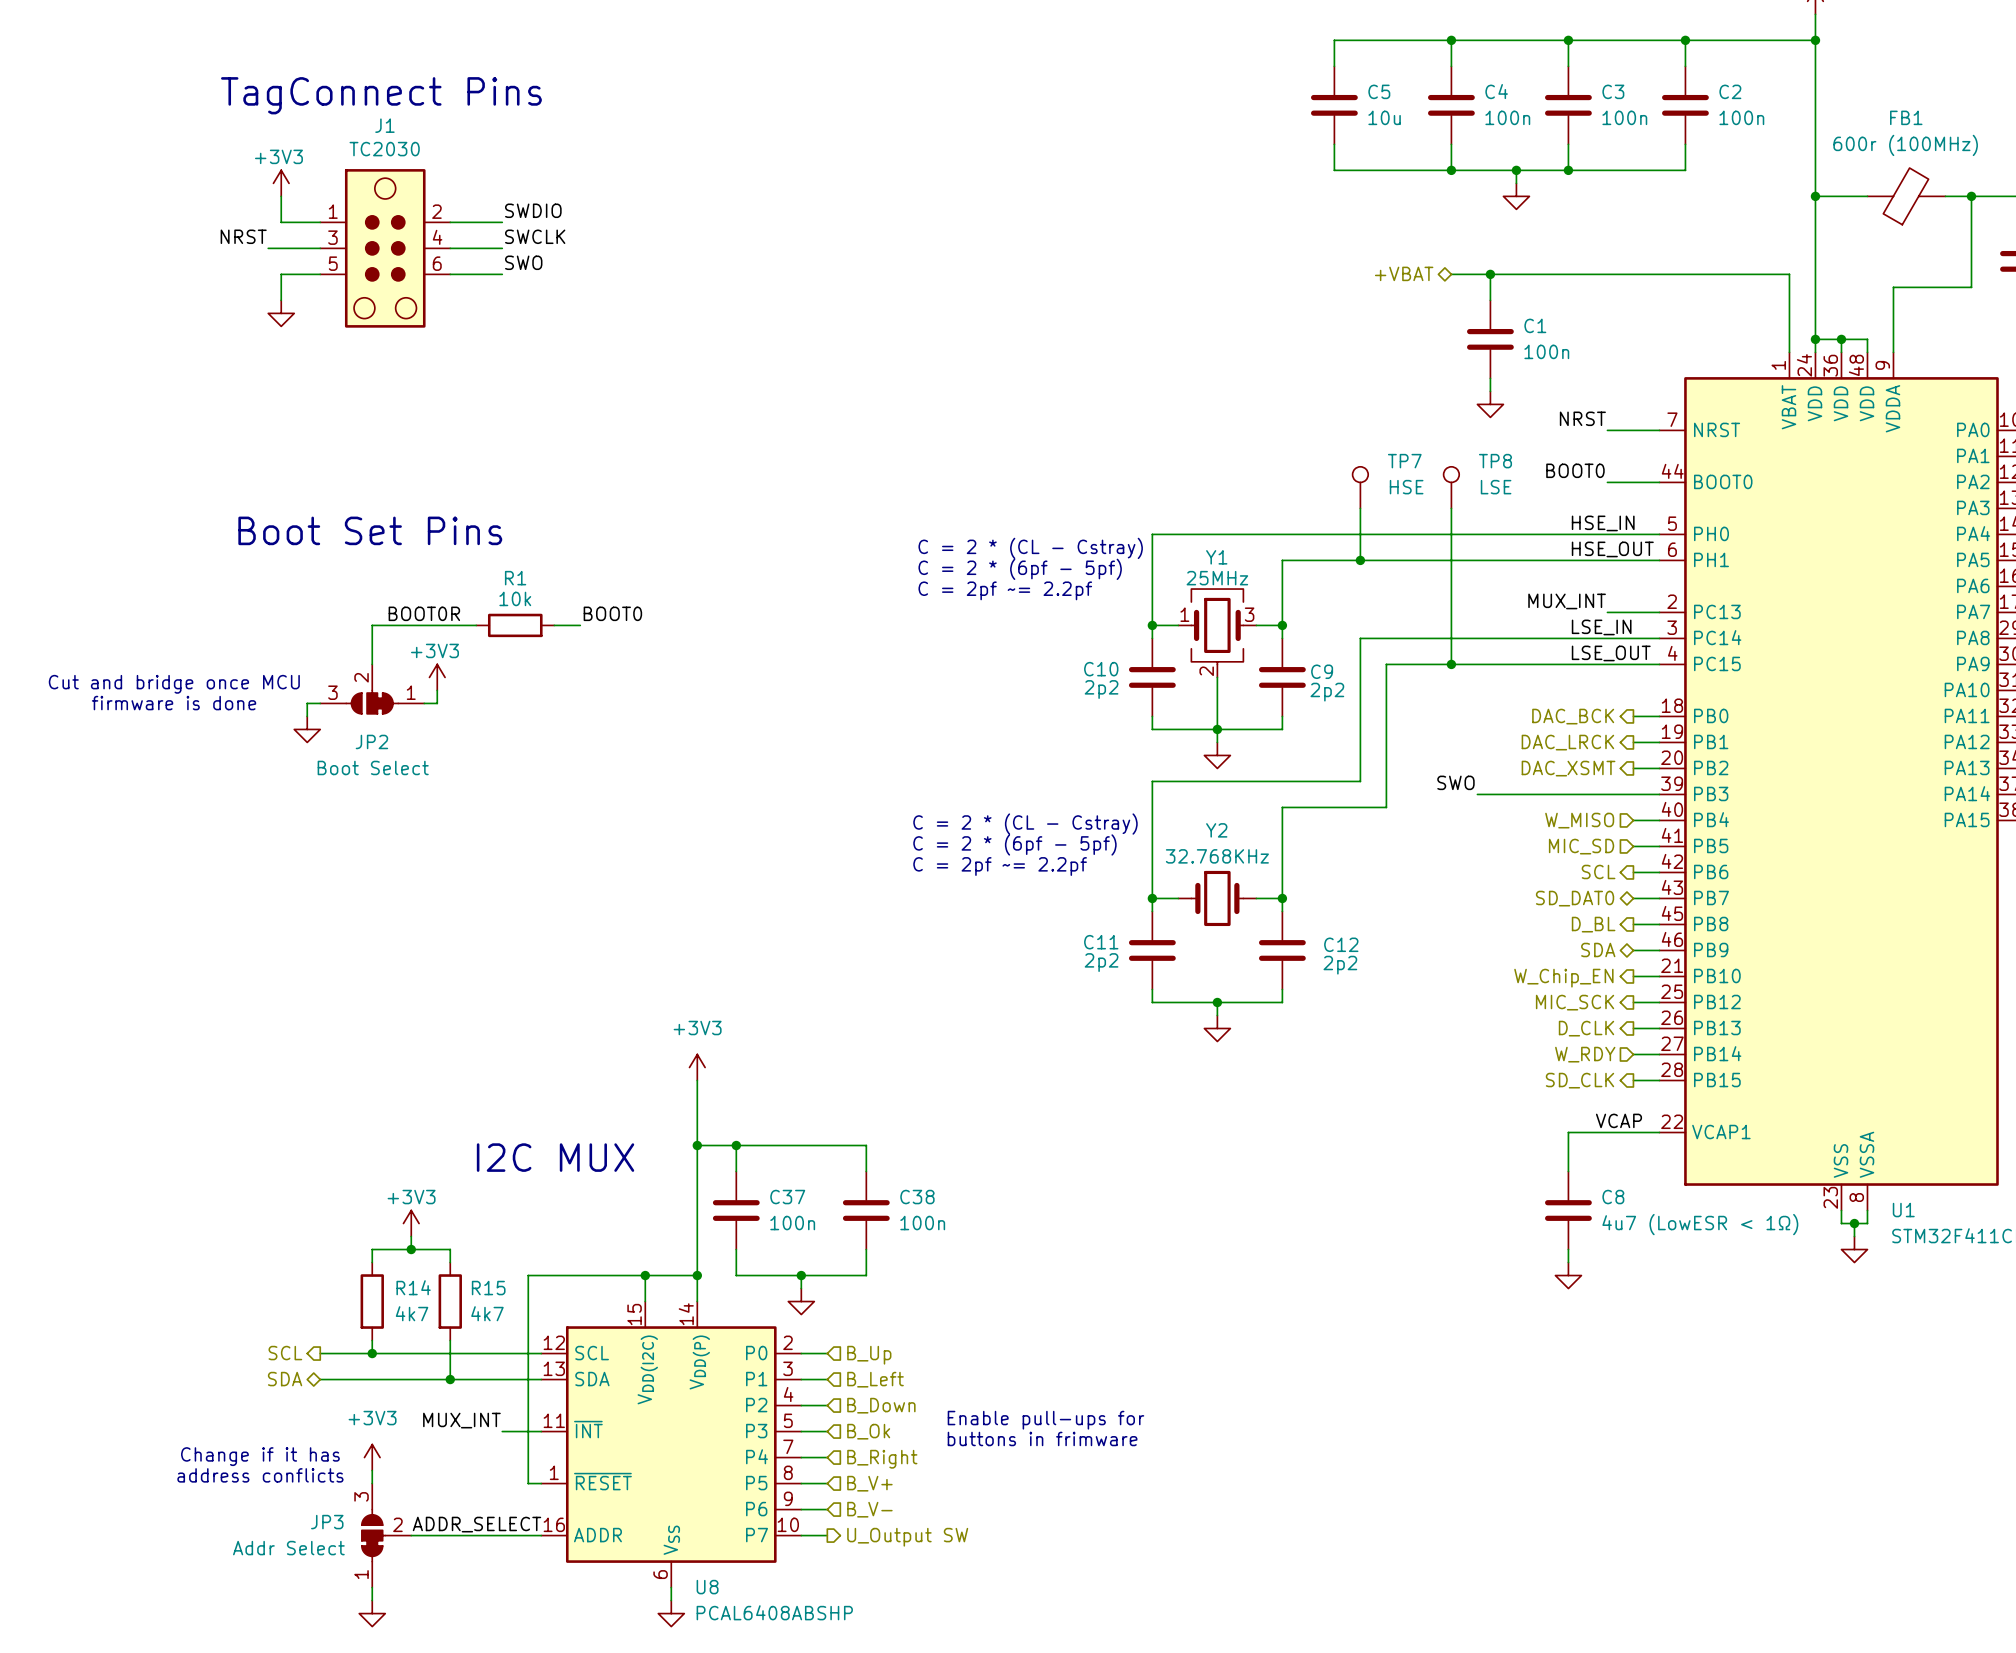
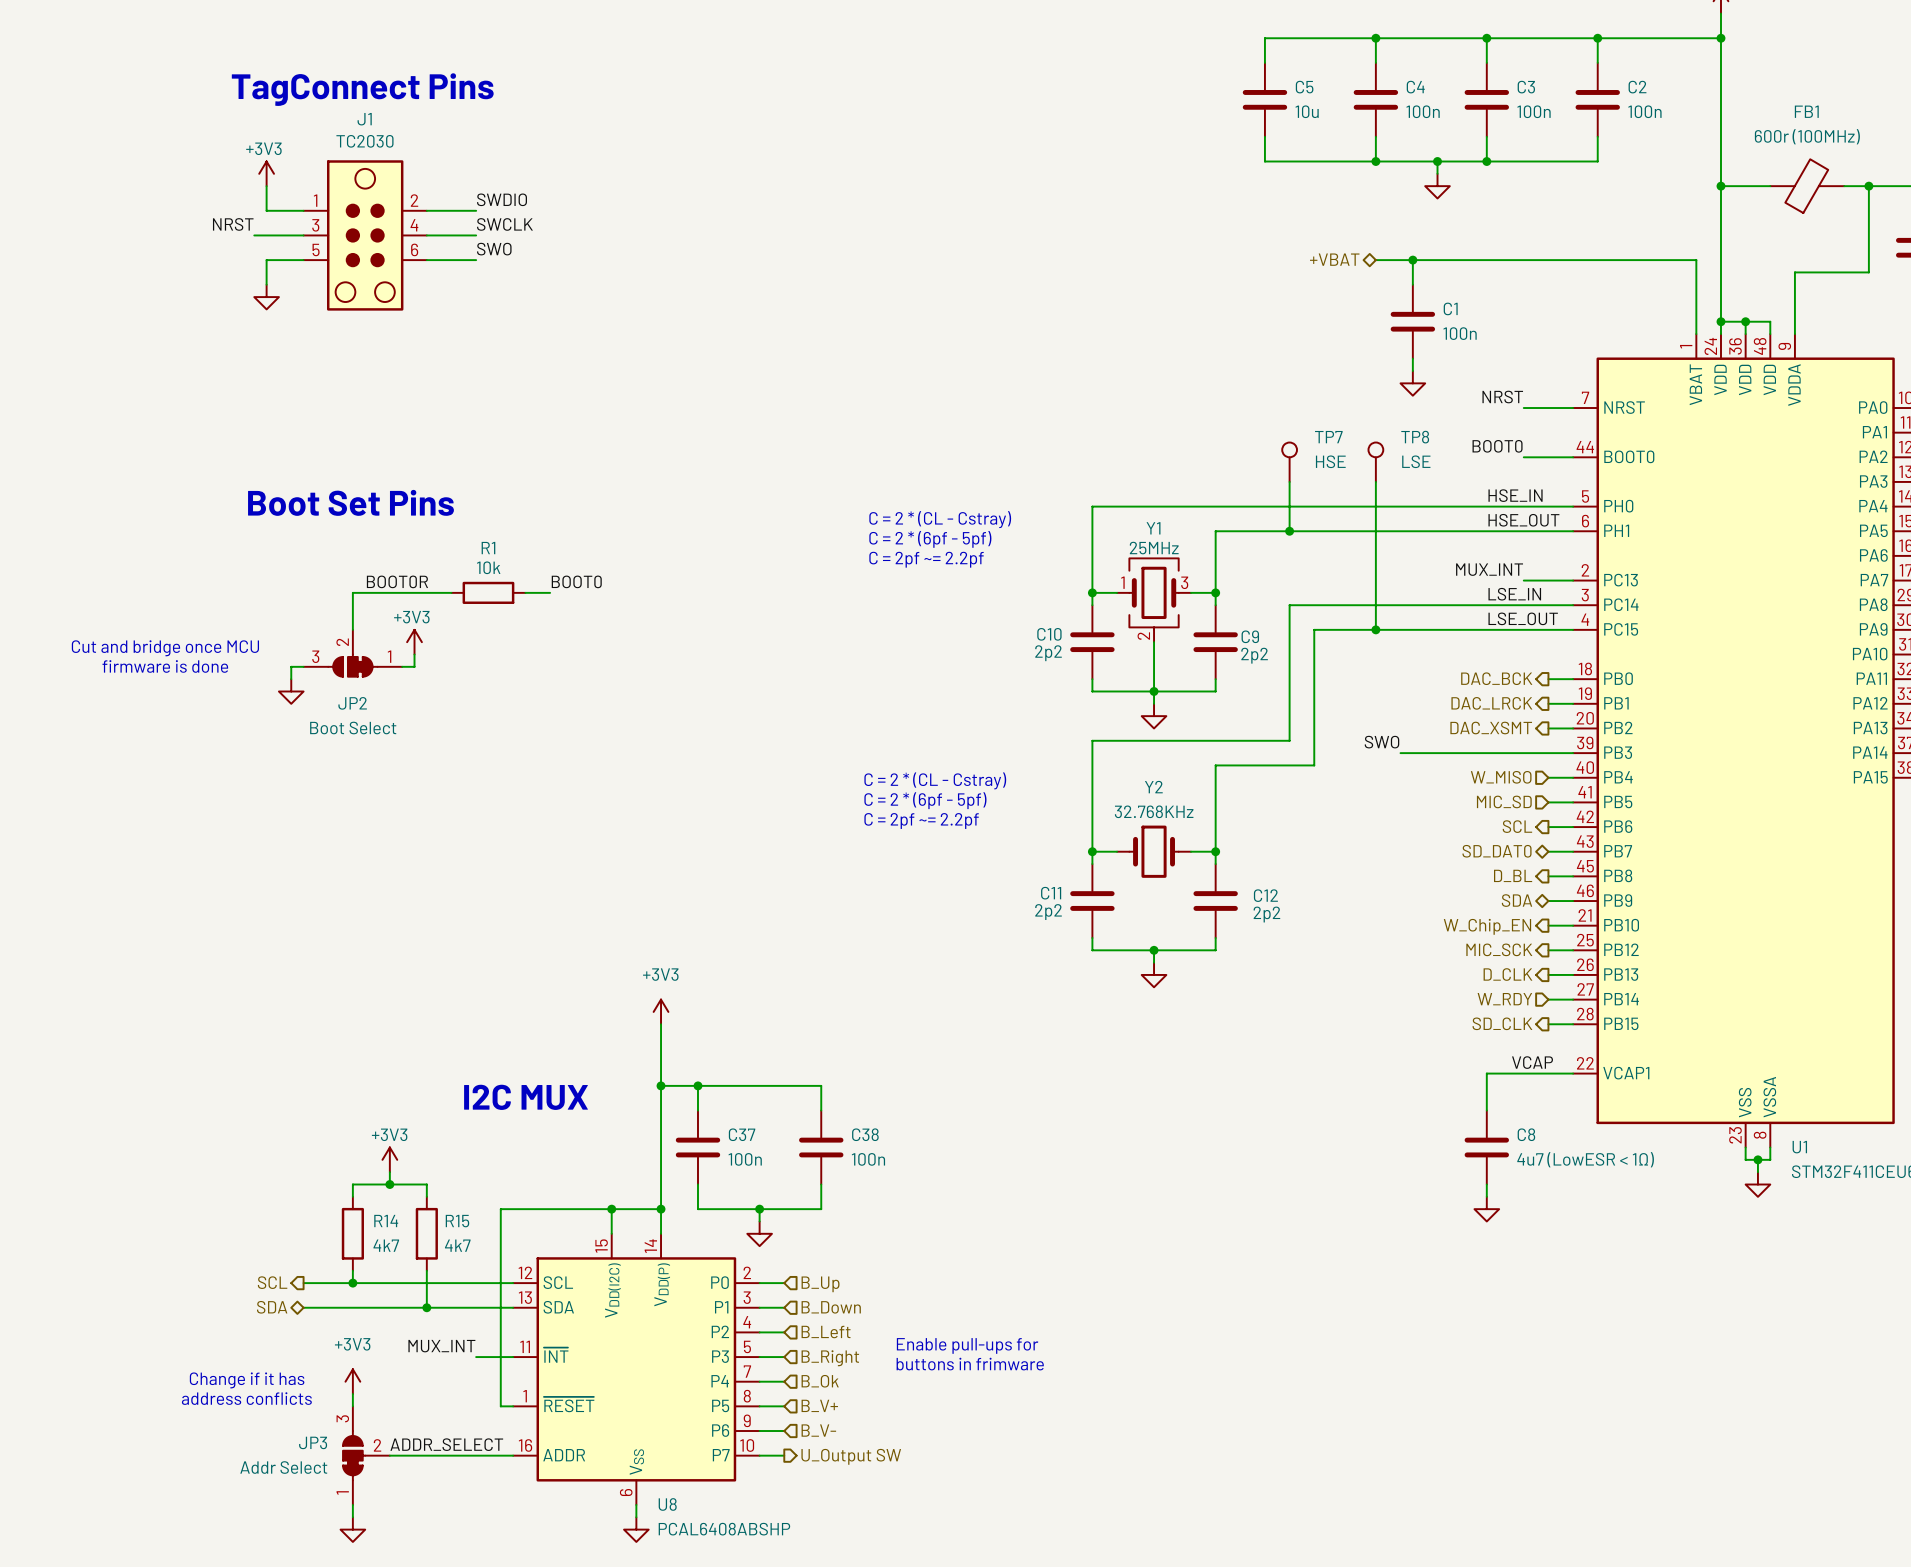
hierarchical label: B_Left (875, 1379) -> B_Down (831, 1307)
hierarchical label: B_Down (881, 1405) -> B_Left (826, 1332)
hierarchical label: B_Ok (868, 1431) -> B_Right (830, 1358)
hierarchical label: B_Right (882, 1459) -> B_Ok (820, 1381)

